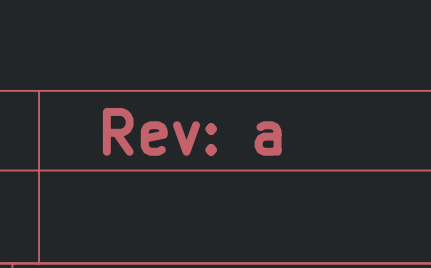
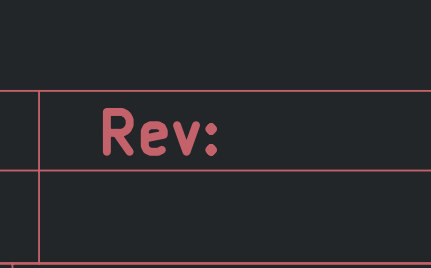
title block: Rev: a (192, 131) -> Rev: (159, 131)

